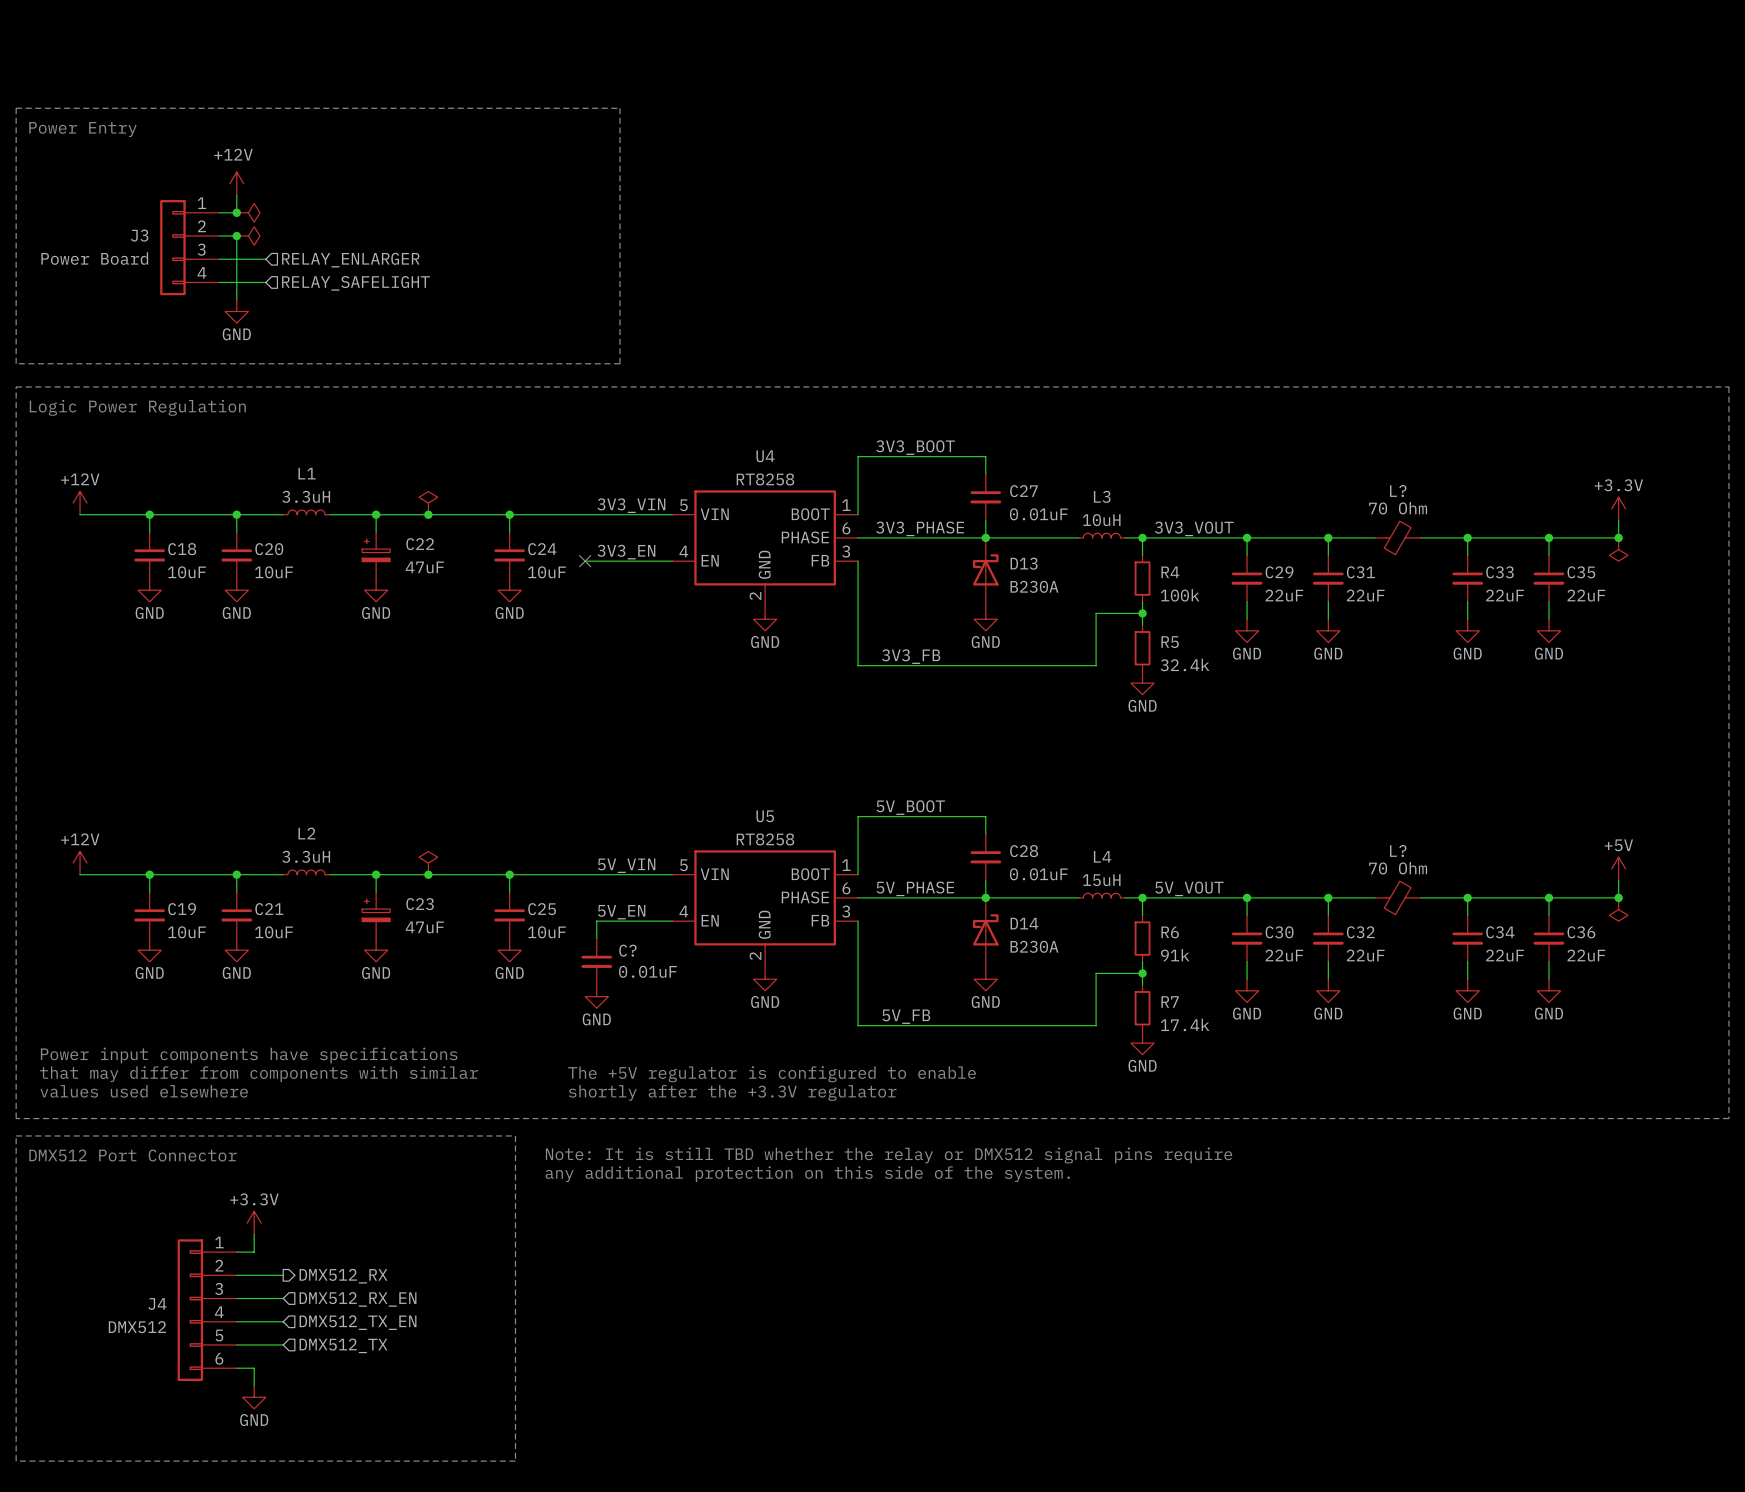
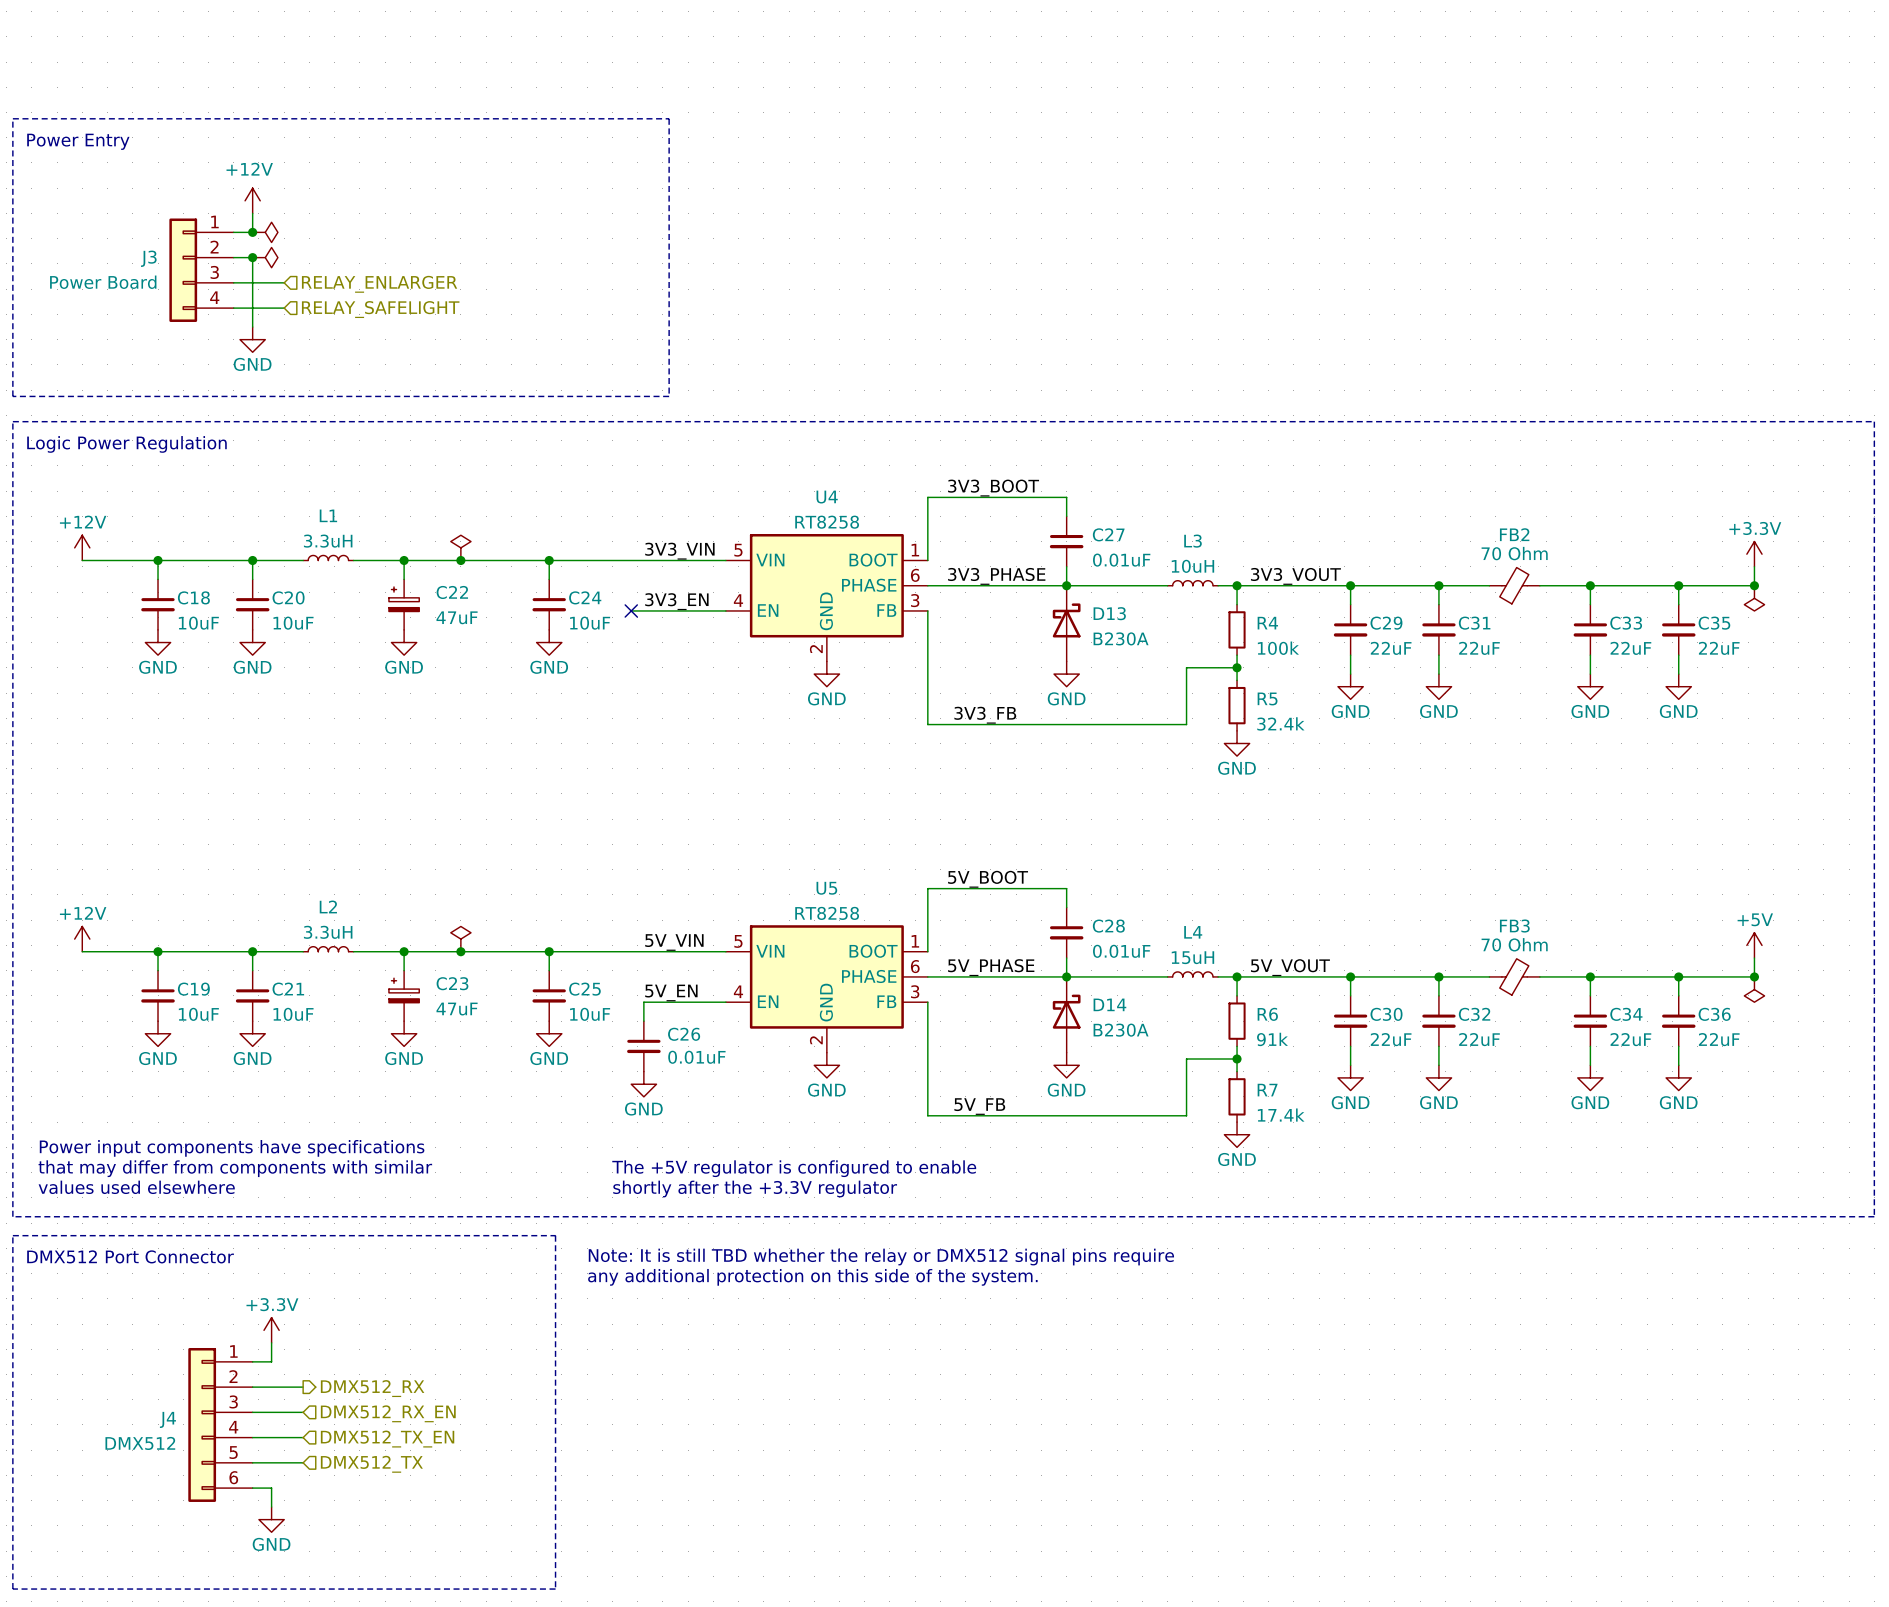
L? name: L? (1398, 491) -> FB2 (1514, 534)
L? name: L? (1398, 851) -> FB3 (1514, 926)
C? name: C? (627, 950) -> C26 (684, 1034)

